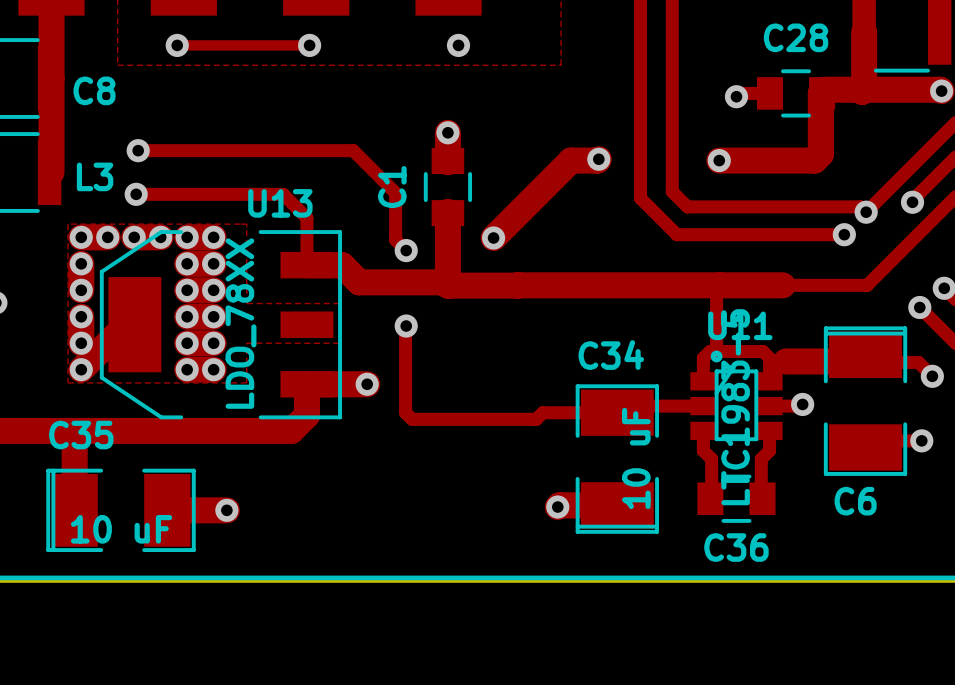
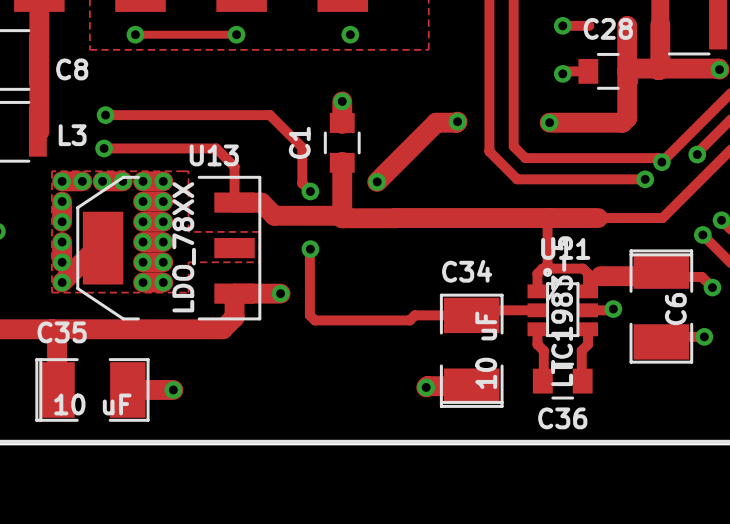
track: none -> (562, 25) (589, 25)
via: none -> (562, 25)
track: none -> (627, 25) (627, 71)
C6 name rotation: 0° (855, 501) -> 90° counterclockwise (675, 309)
C6 name position: C6 (855, 501) -> C6 (675, 309)

